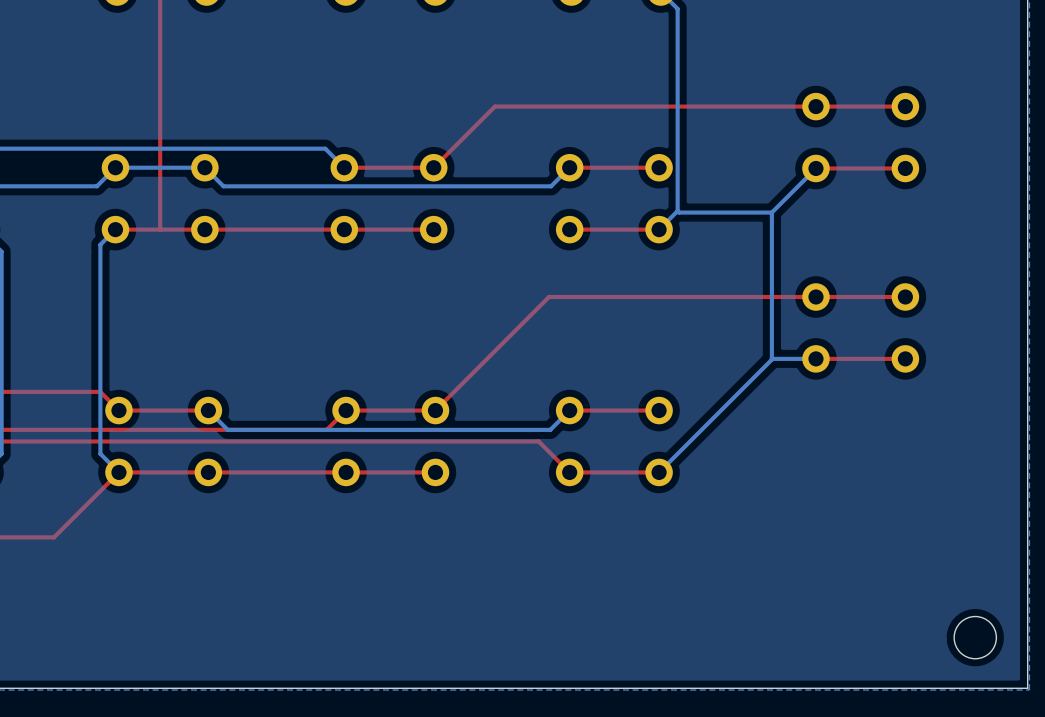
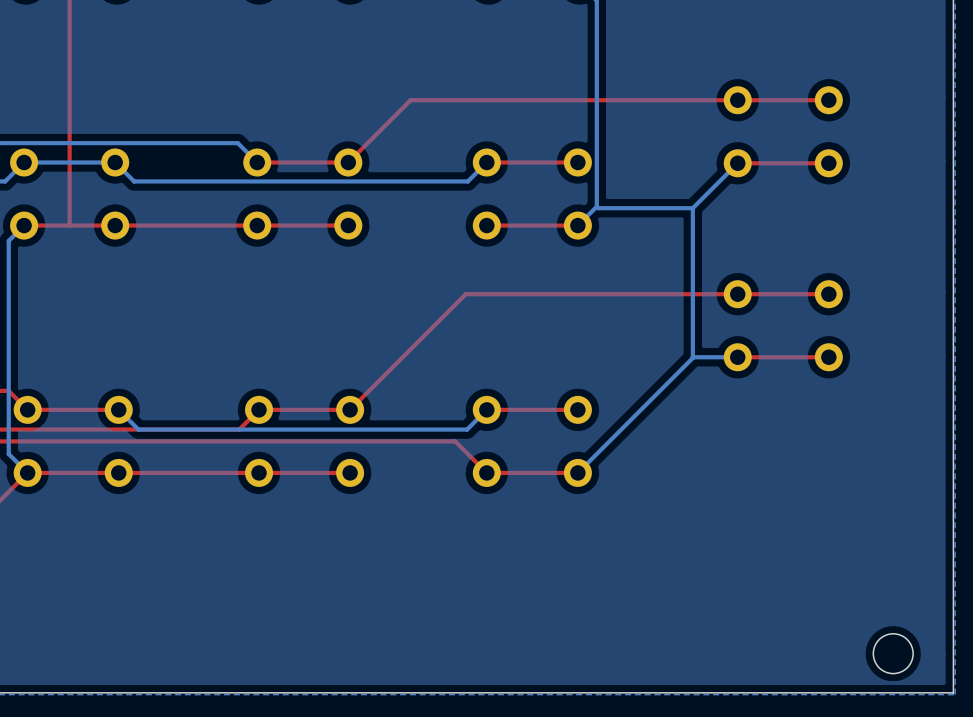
round board edge: [953, 616, 997, 660] -> none
round board edge: none -> [872, 633, 914, 674]

